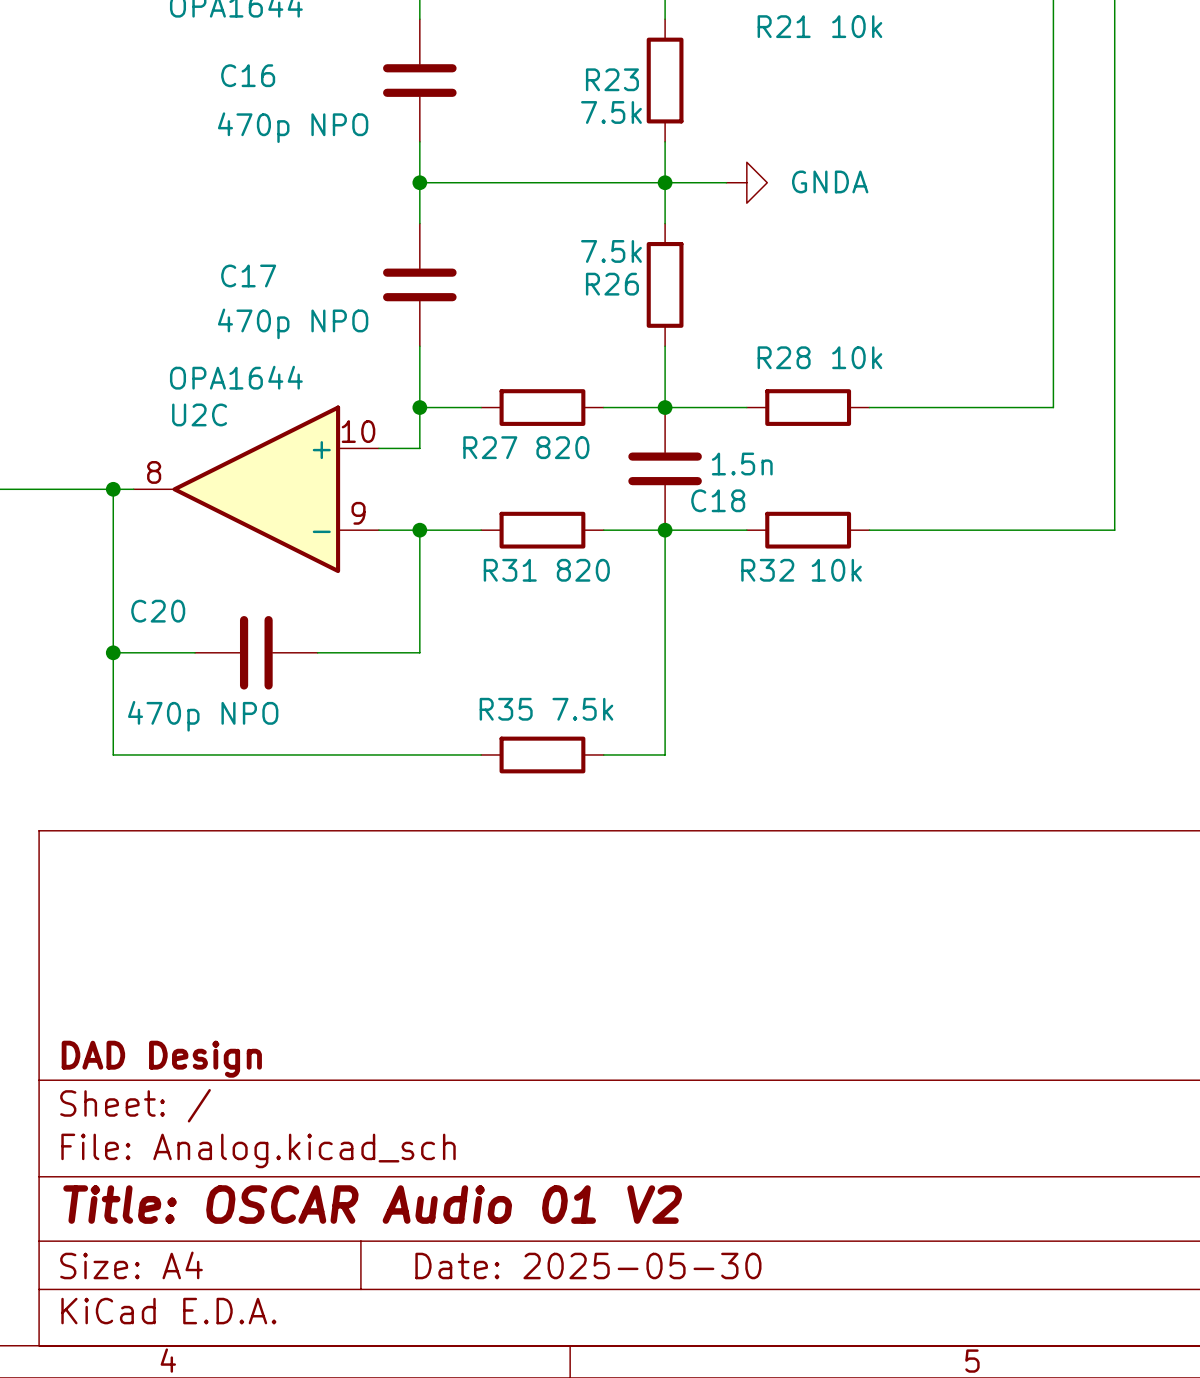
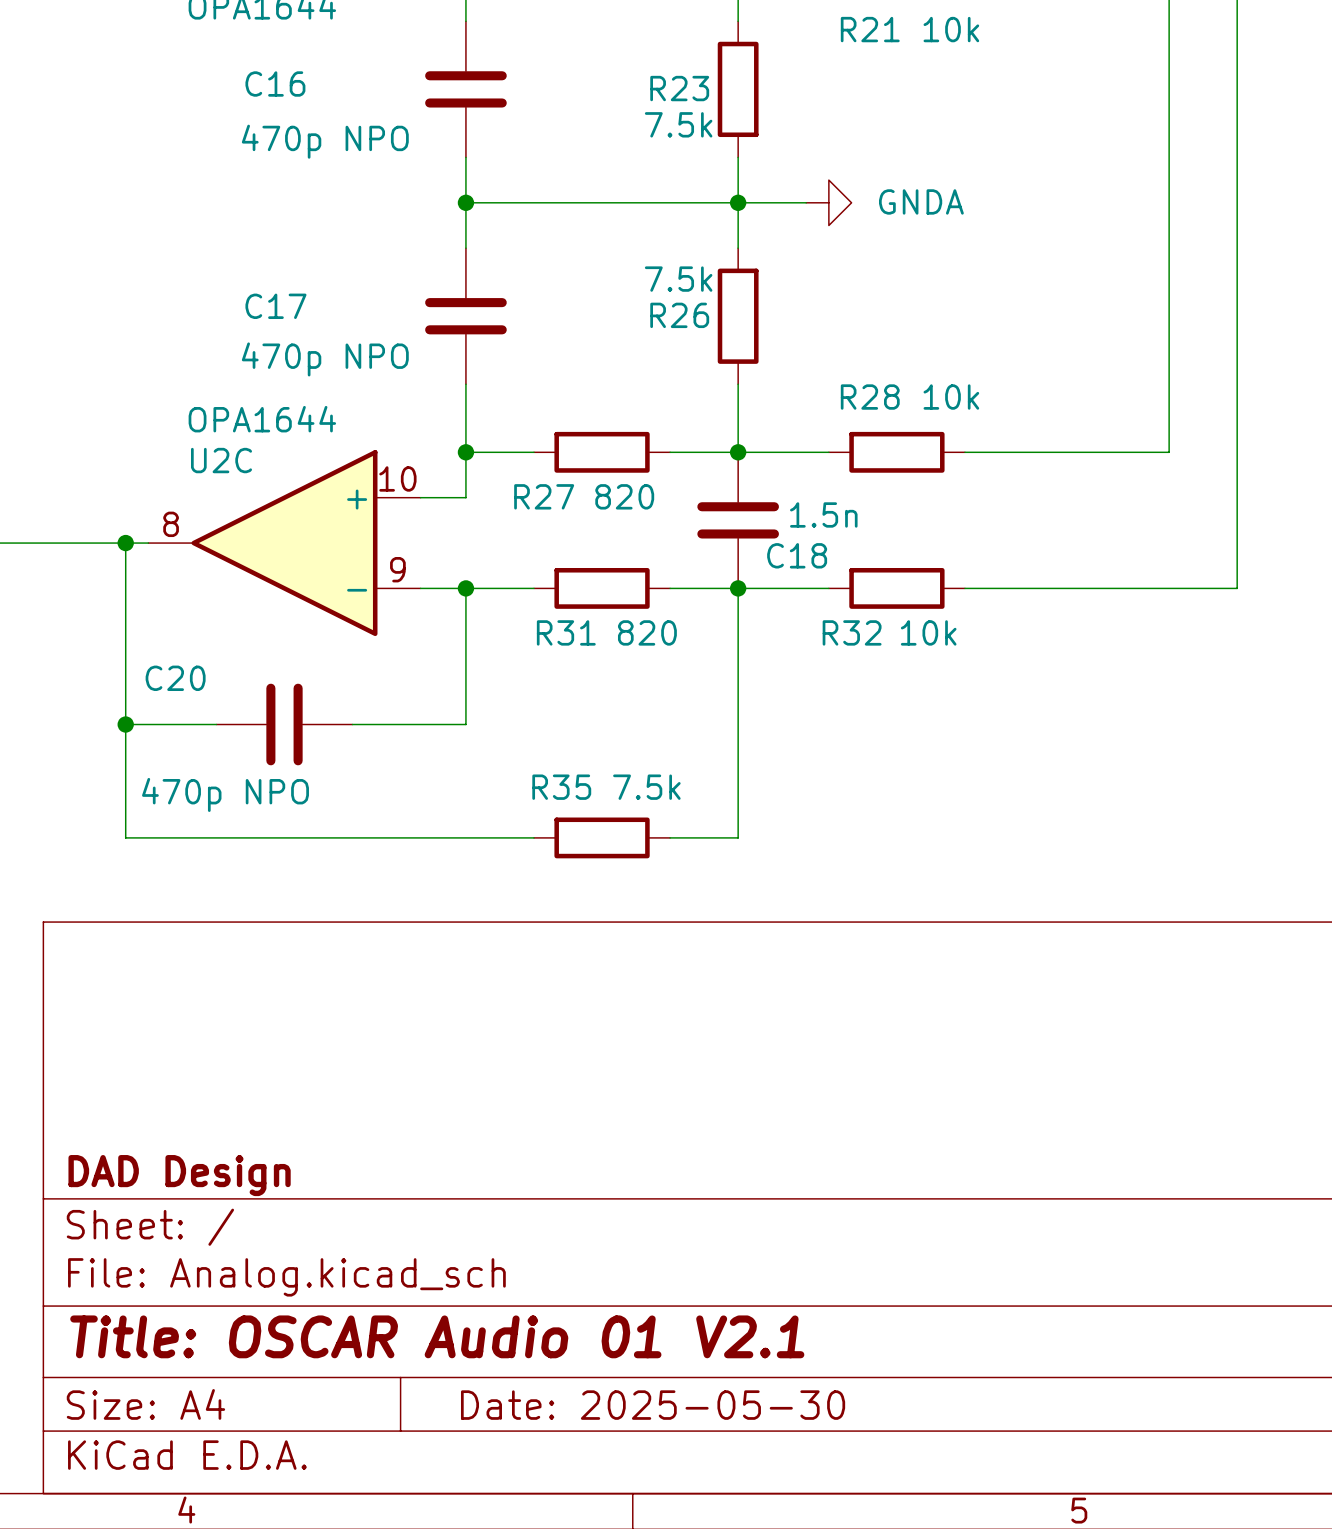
title block: Title: OSCAR Audio 01 V2 (372, 1204) -> Title: OSCAR Audio 01 V2.1 (437, 1336)

